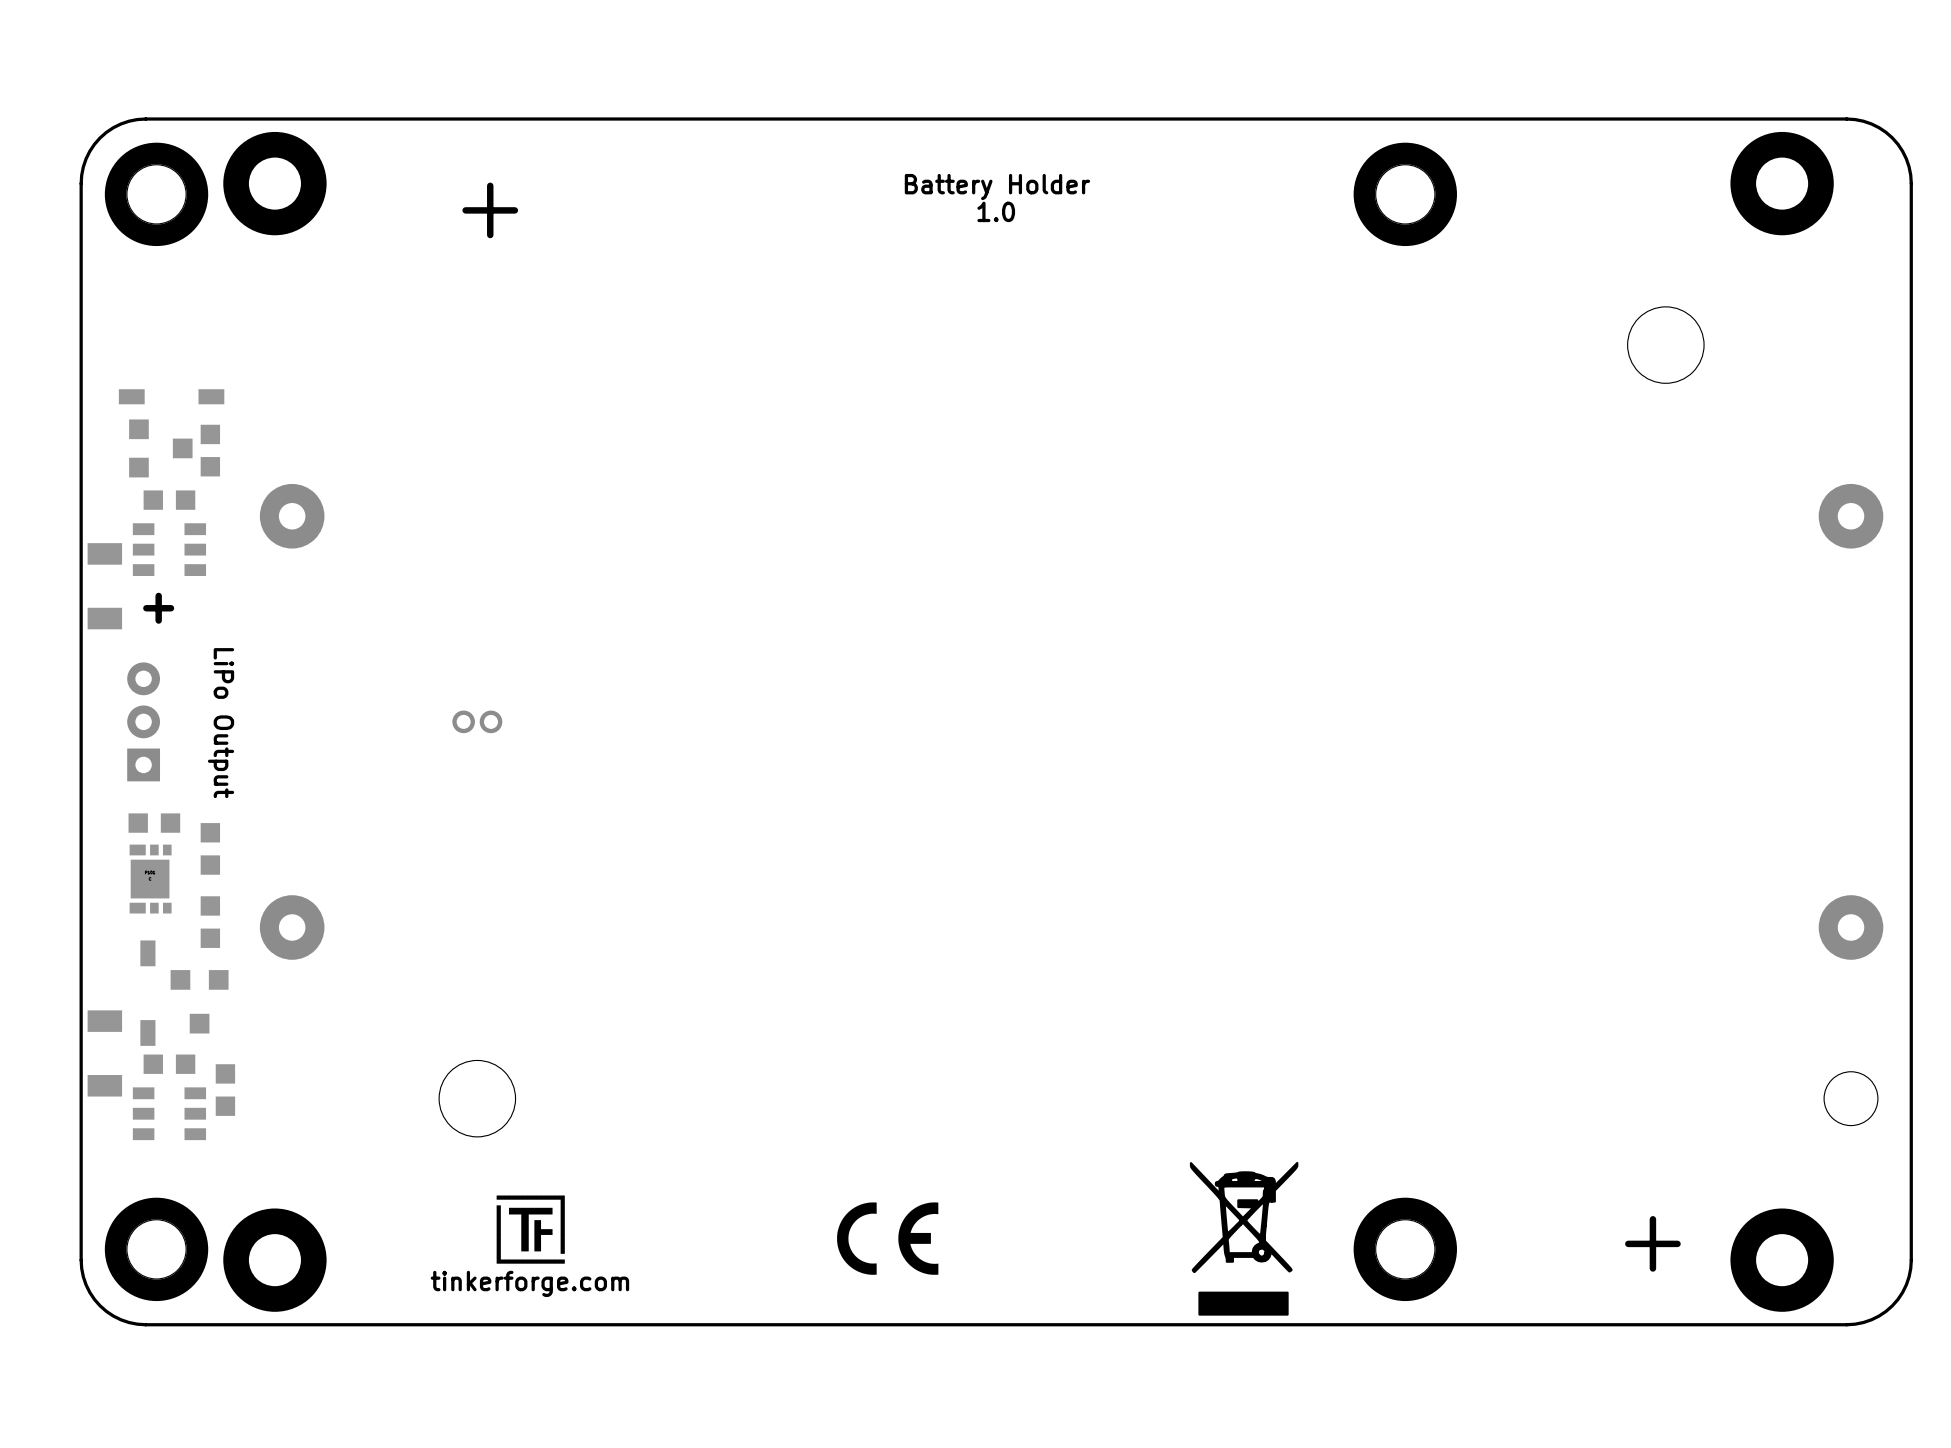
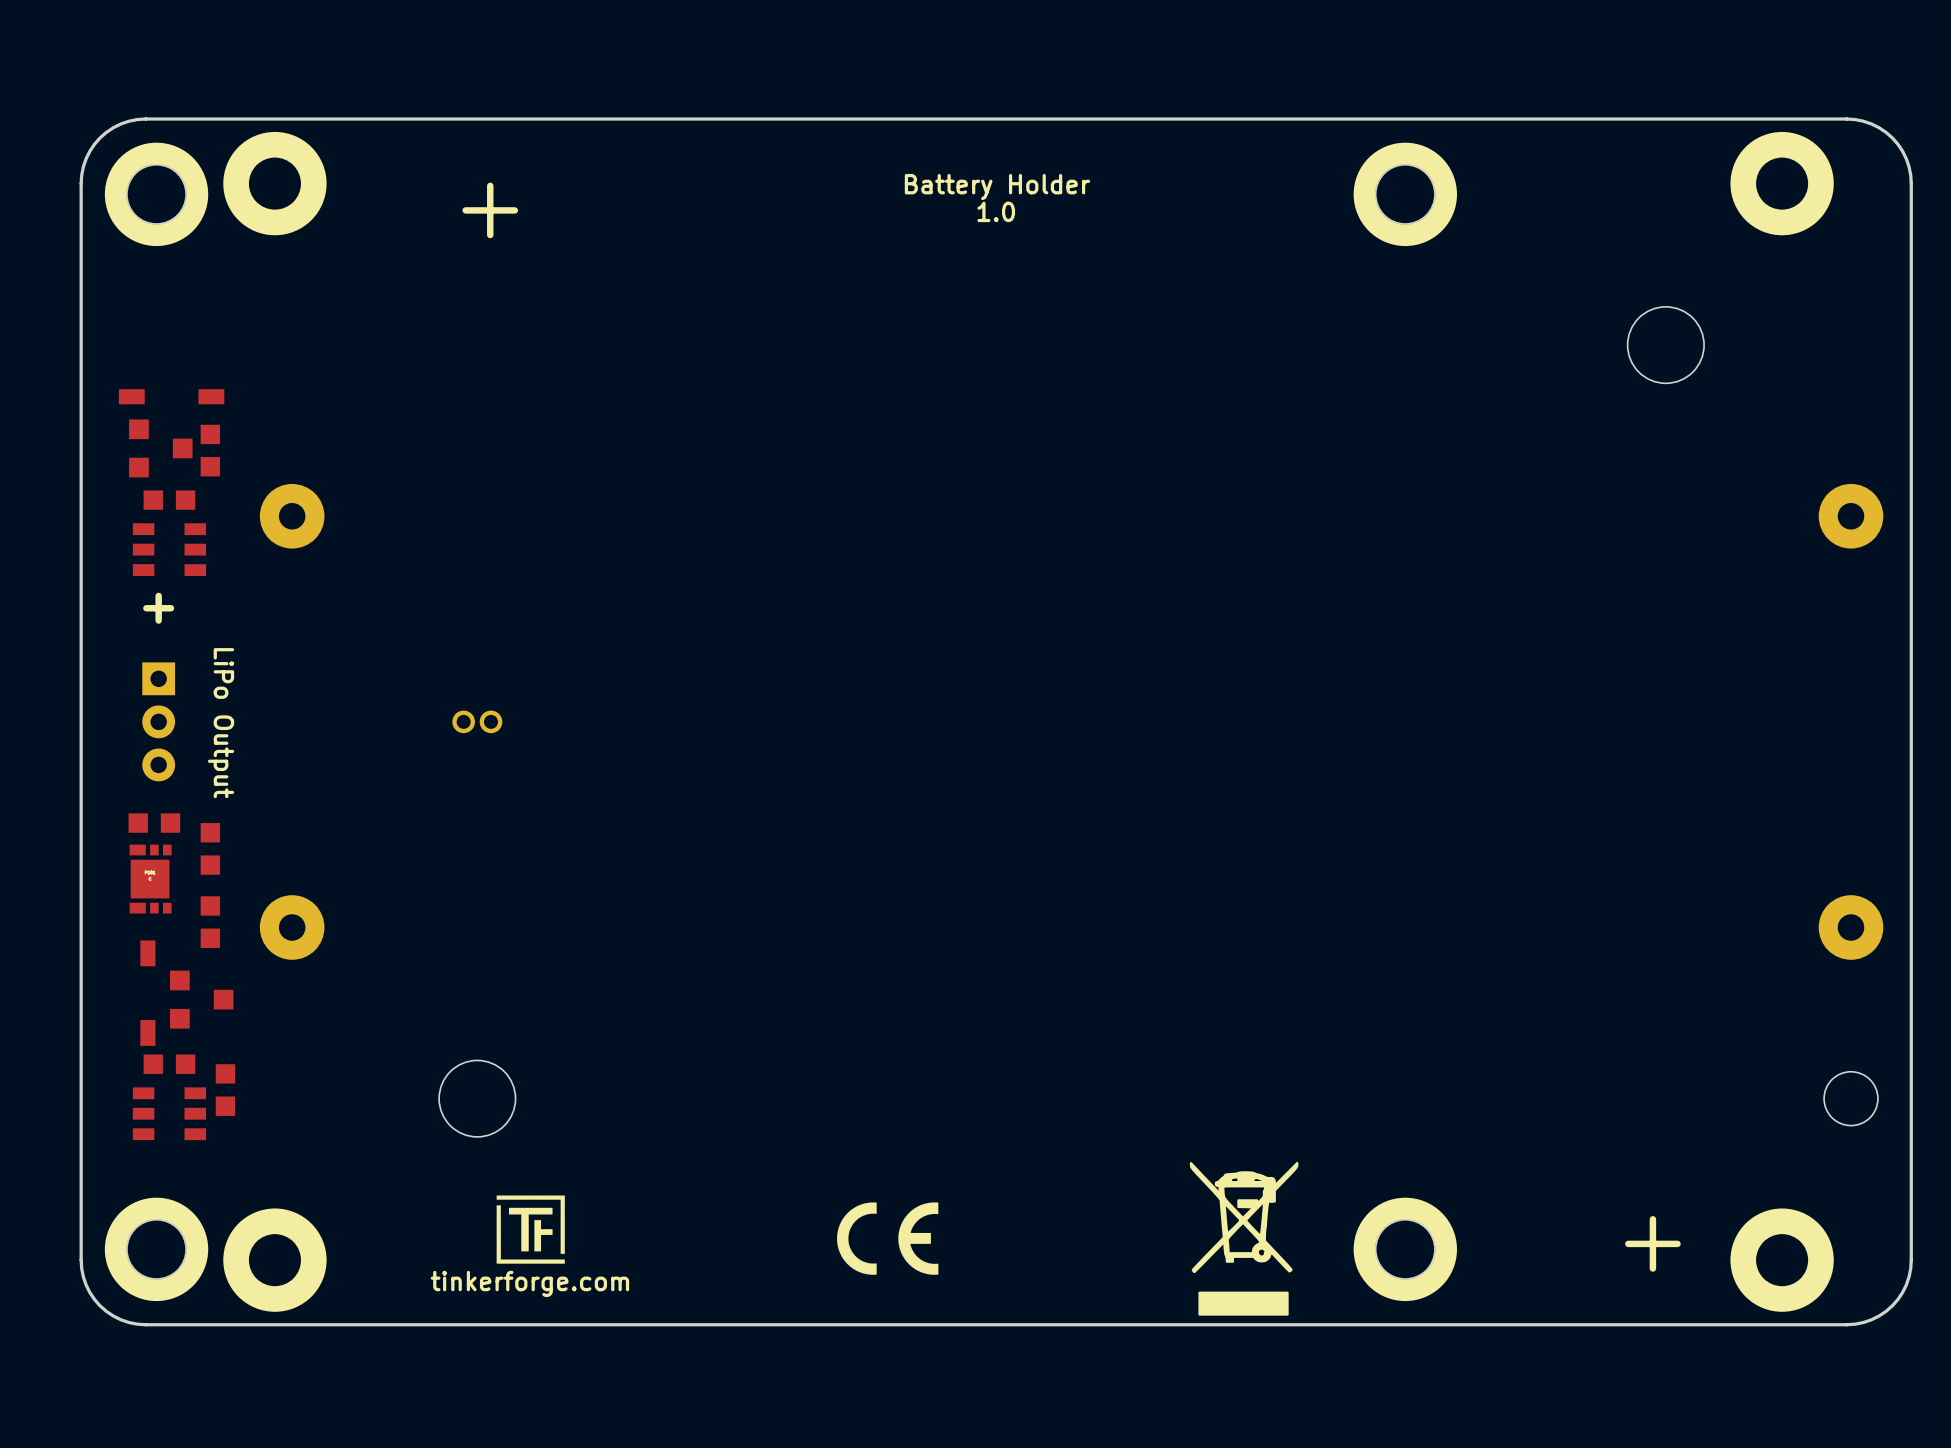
part: (104, 586) -> none
part rotation: 0° (143, 721) -> 180° (158, 721)
part rotation: 0° (199, 1001) -> 90° counterclockwise (201, 999)
part: (104, 1053) -> none

